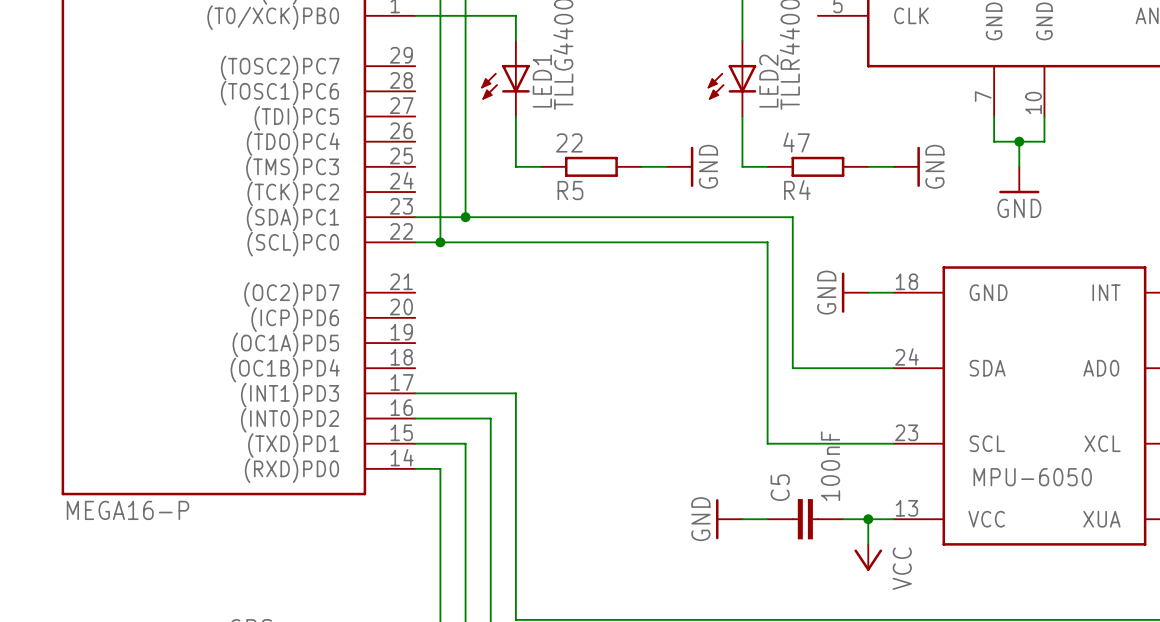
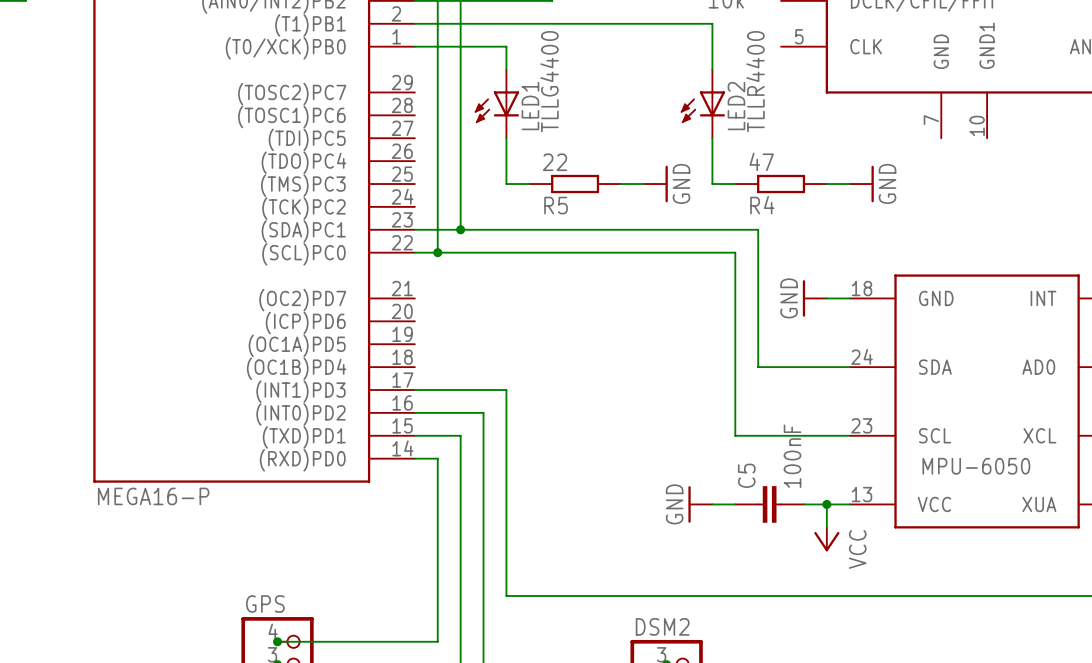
wire: (994, 116) (994, 141) (1044, 141) (1044, 116) -> none
wire: (1019, 141) (1019, 166) -> none
junction: (1019, 141) -> none
power symbol: GND (1019, 180) -> none

